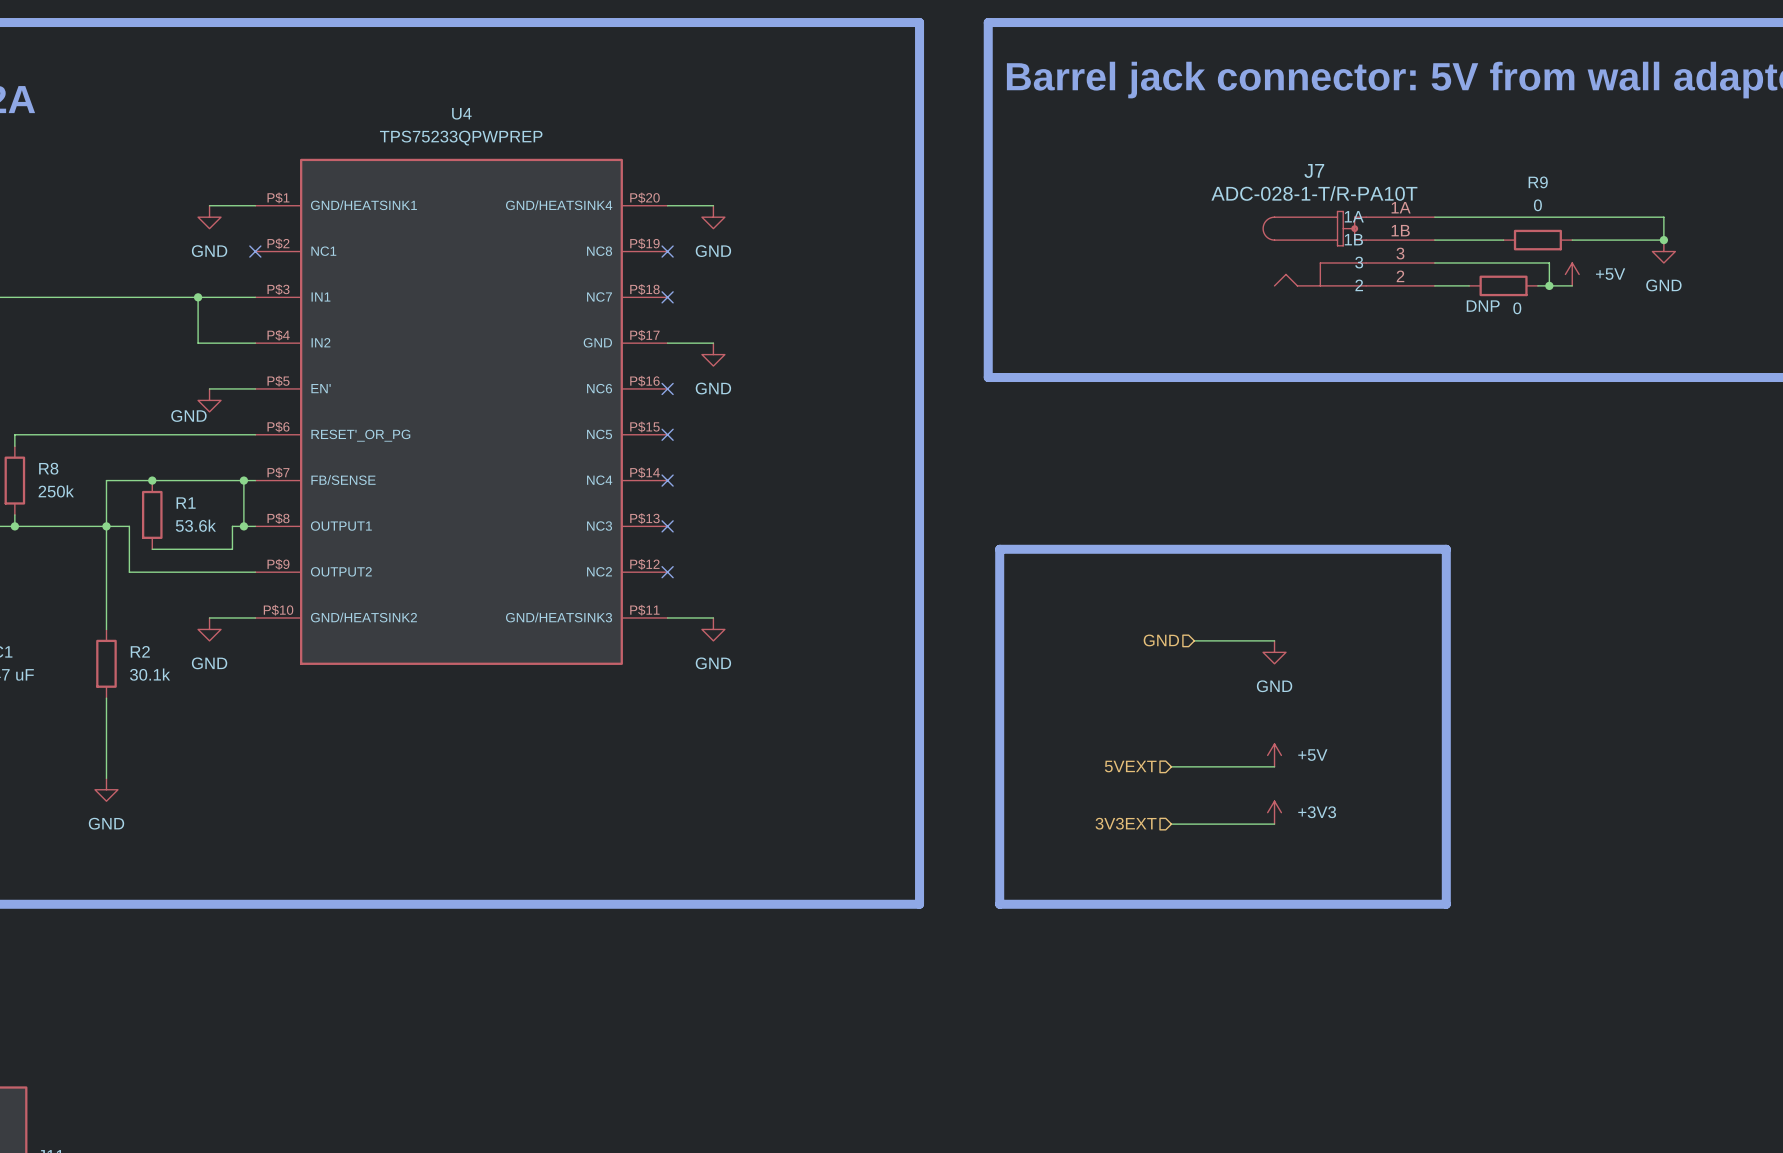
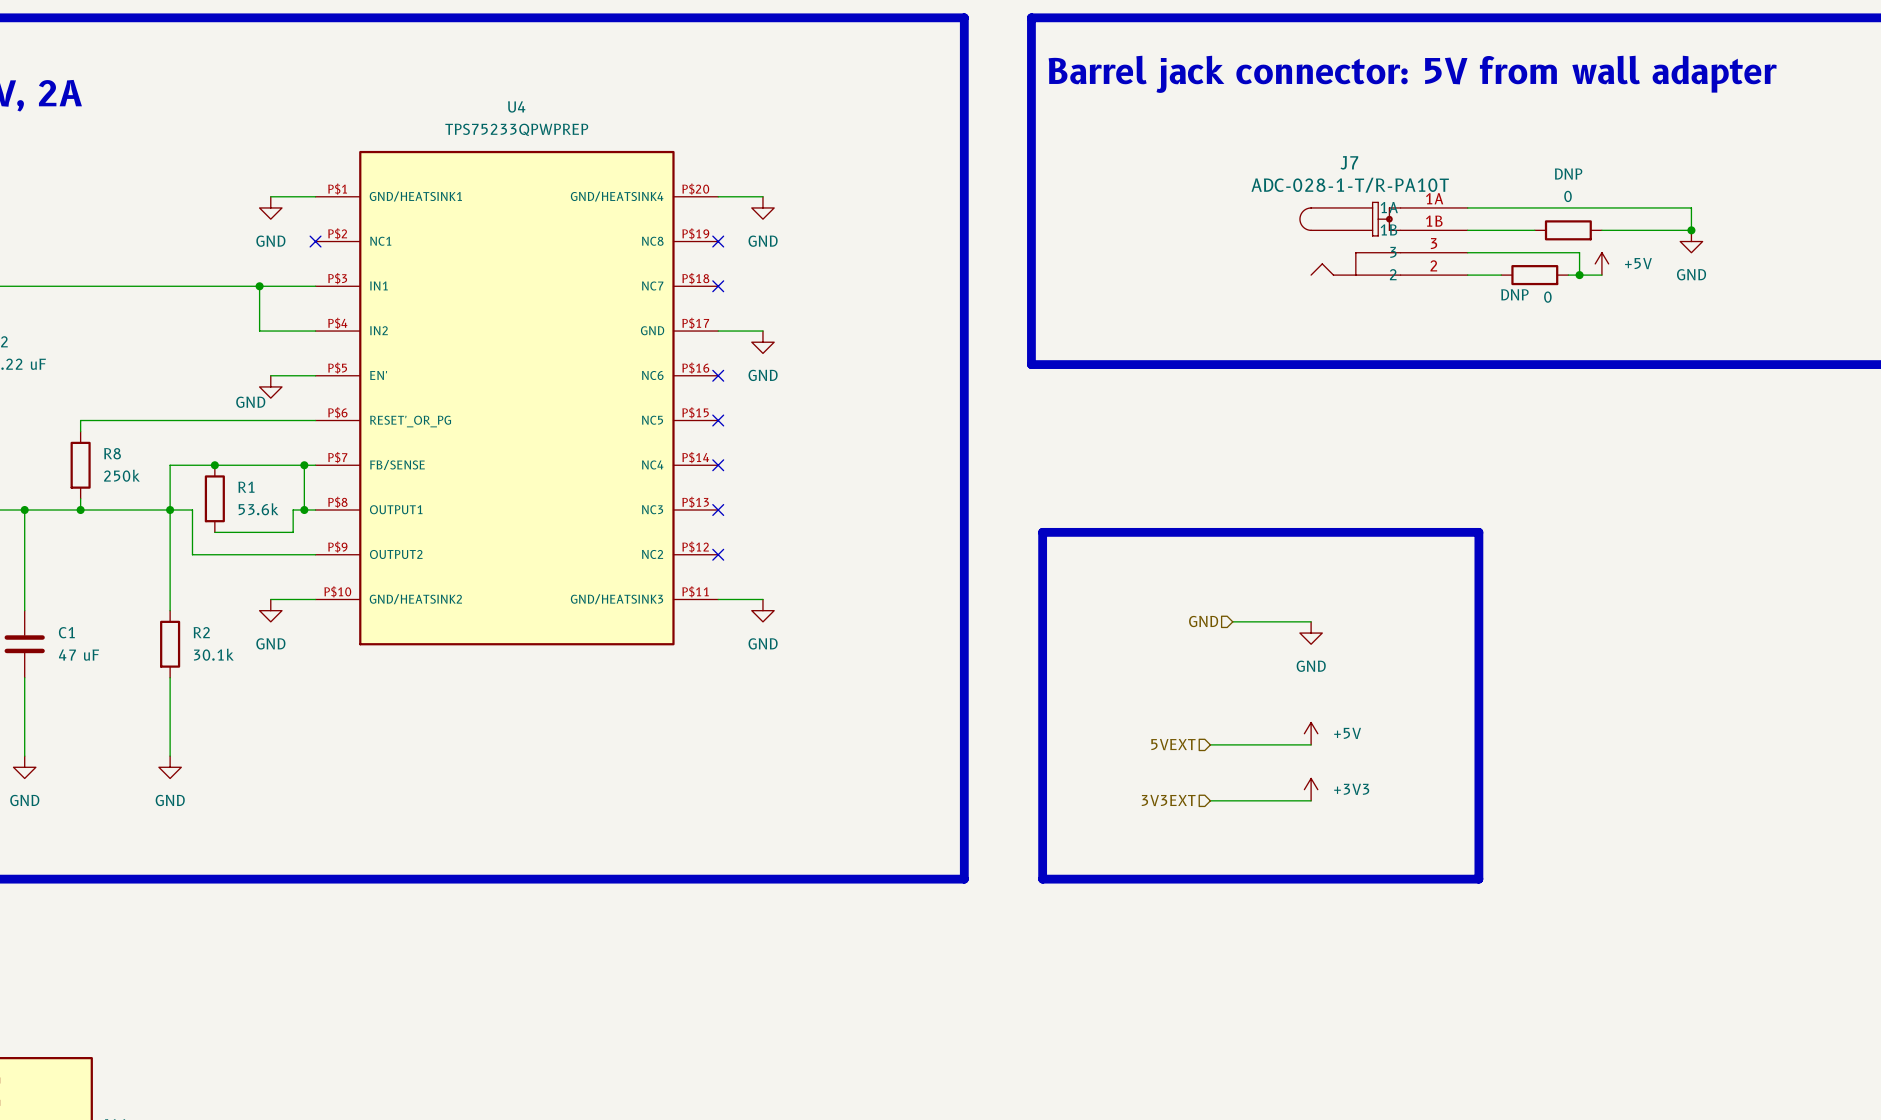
R9 name: R9 (1538, 182) -> DNP (1568, 174)

